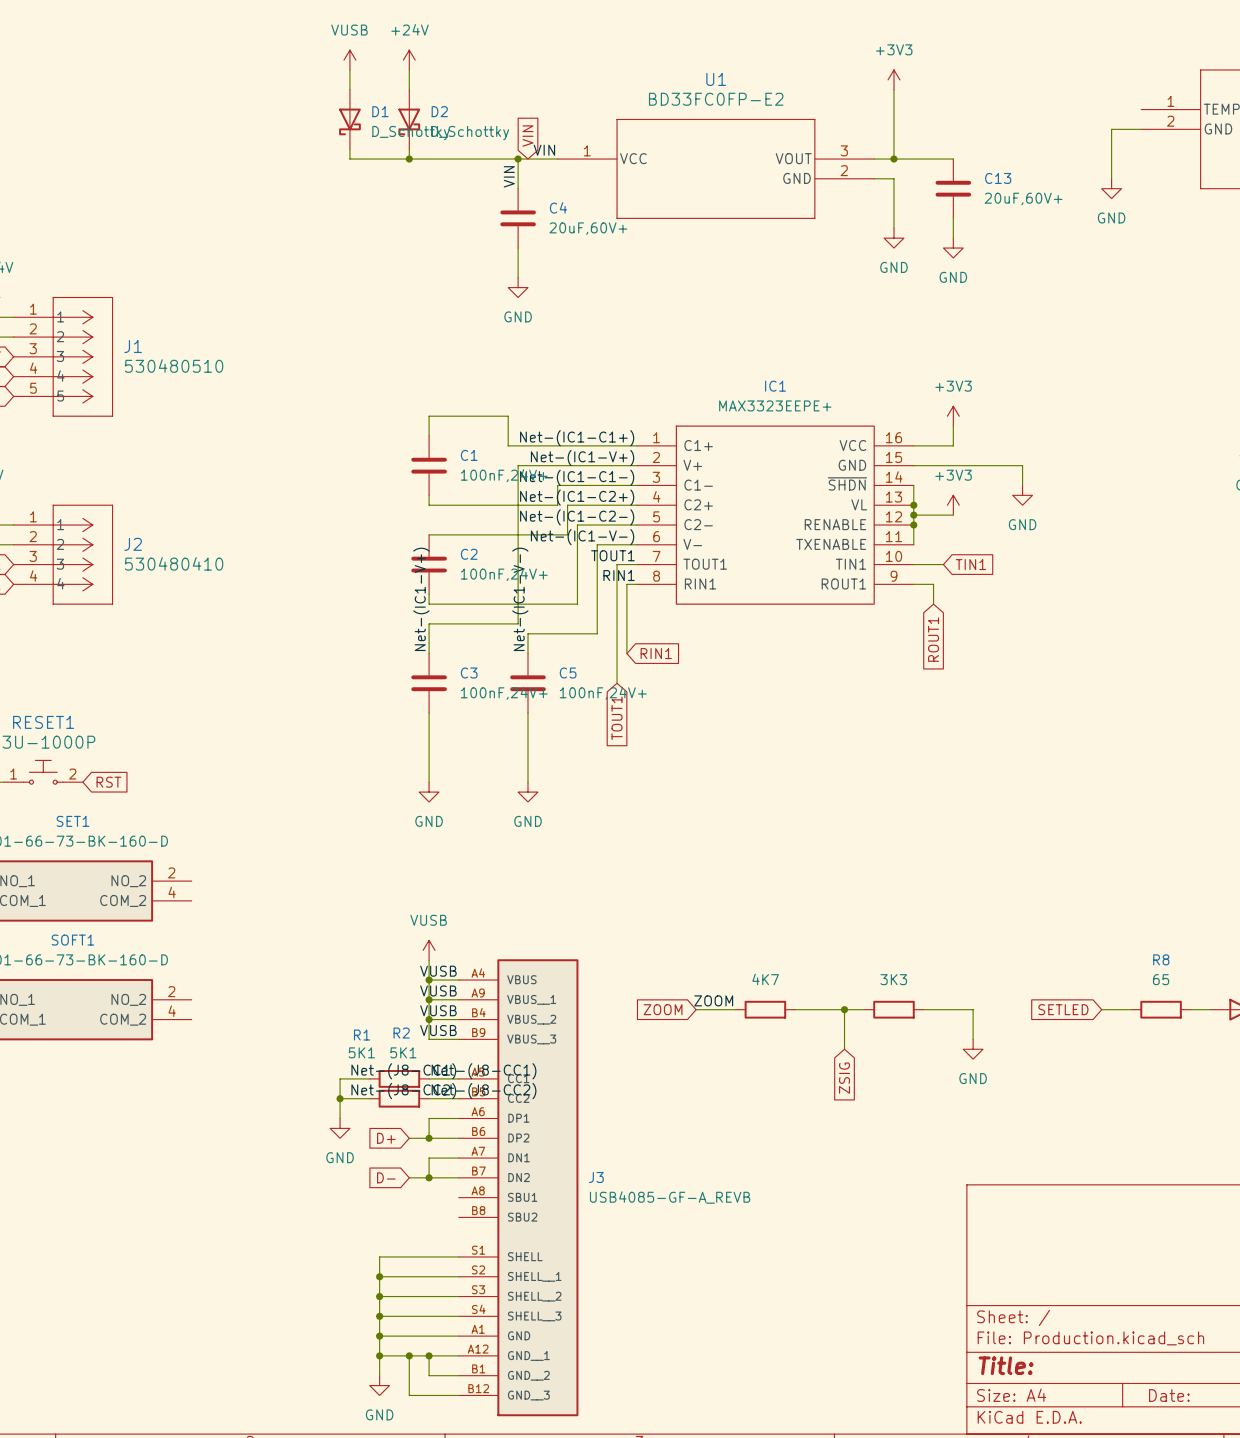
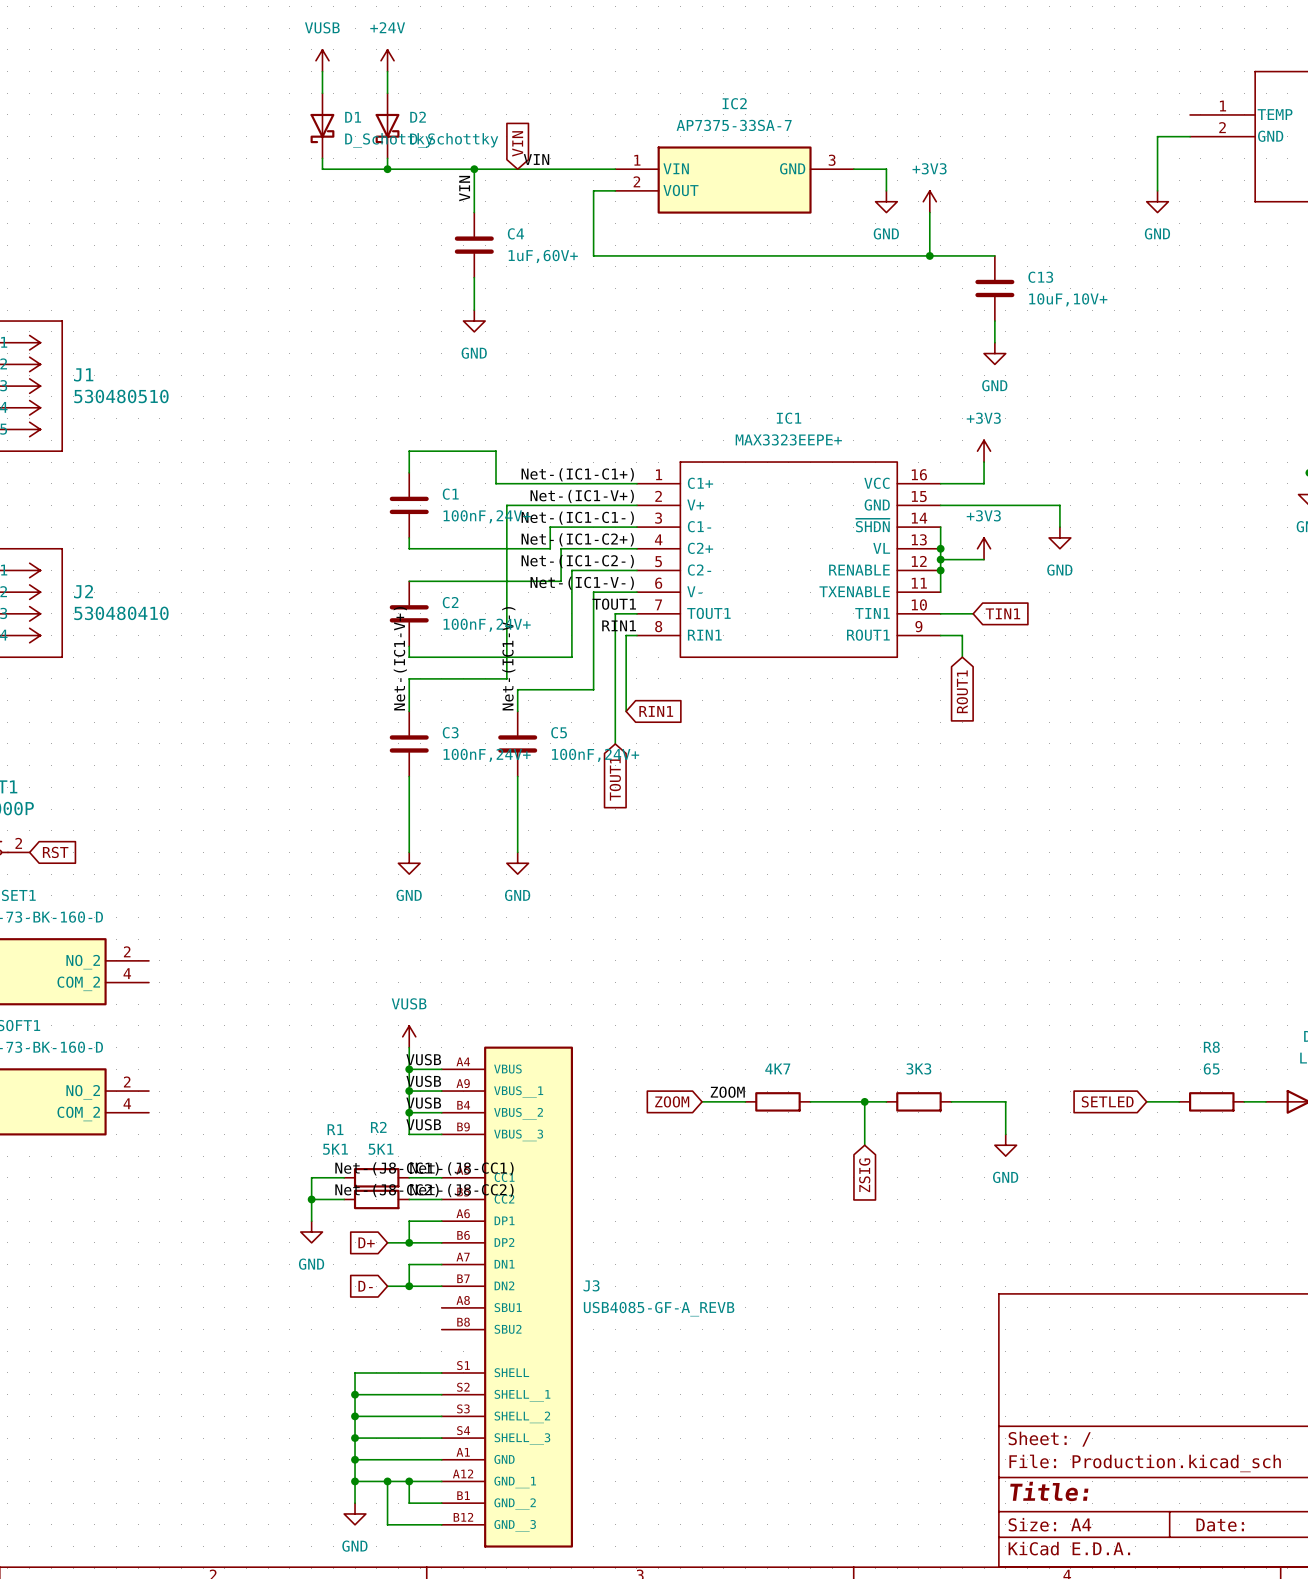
power symbol position: +3V3 (893, 79) -> +3V3 (929, 201)
wire: (893, 89) (893, 159) -> none
wire: none -> (474, 169) (474, 212)
wire: (518, 159) (518, 188) -> none
junction position: (518, 159) -> (474, 169)
wire: none -> (853, 169) (886, 169) (886, 190)
wire: (874, 159) (953, 159) -> none
junction: (893, 159) -> none
U1: BD33FC0FP-E2 (715, 168) -> none
IC2: none -> AP7375-33SA-7 (734, 180)
label position: VIN (509, 176) -> VIN (464, 188)
wire: none -> (615, 190) (593, 190) (593, 255) (994, 255)
wire: (874, 178) (893, 178) (893, 228) -> none
power symbol: none -> GND (886, 201)
C13 position: (953, 188) -> (994, 288)
wire: none -> (929, 212) (929, 255)
C13 value: 20uF,60V+ (1023, 198) -> 10uF,10V+ (1068, 299)
C4 position: (518, 218) -> (474, 245)
wire: (953, 218) (953, 238) -> (994, 321) (994, 342)
C4 value: 20uF,60V+ (588, 228) -> 1uF,60V+ (543, 256)
power symbol: GND (893, 238) -> none
junction: none -> (929, 255)
wire: (518, 248) (518, 277) -> (474, 277) (474, 310)
power symbol: GND (953, 248) -> none
power symbol position: GND (518, 287) -> GND (474, 321)
power symbol: none -> GND (994, 353)

